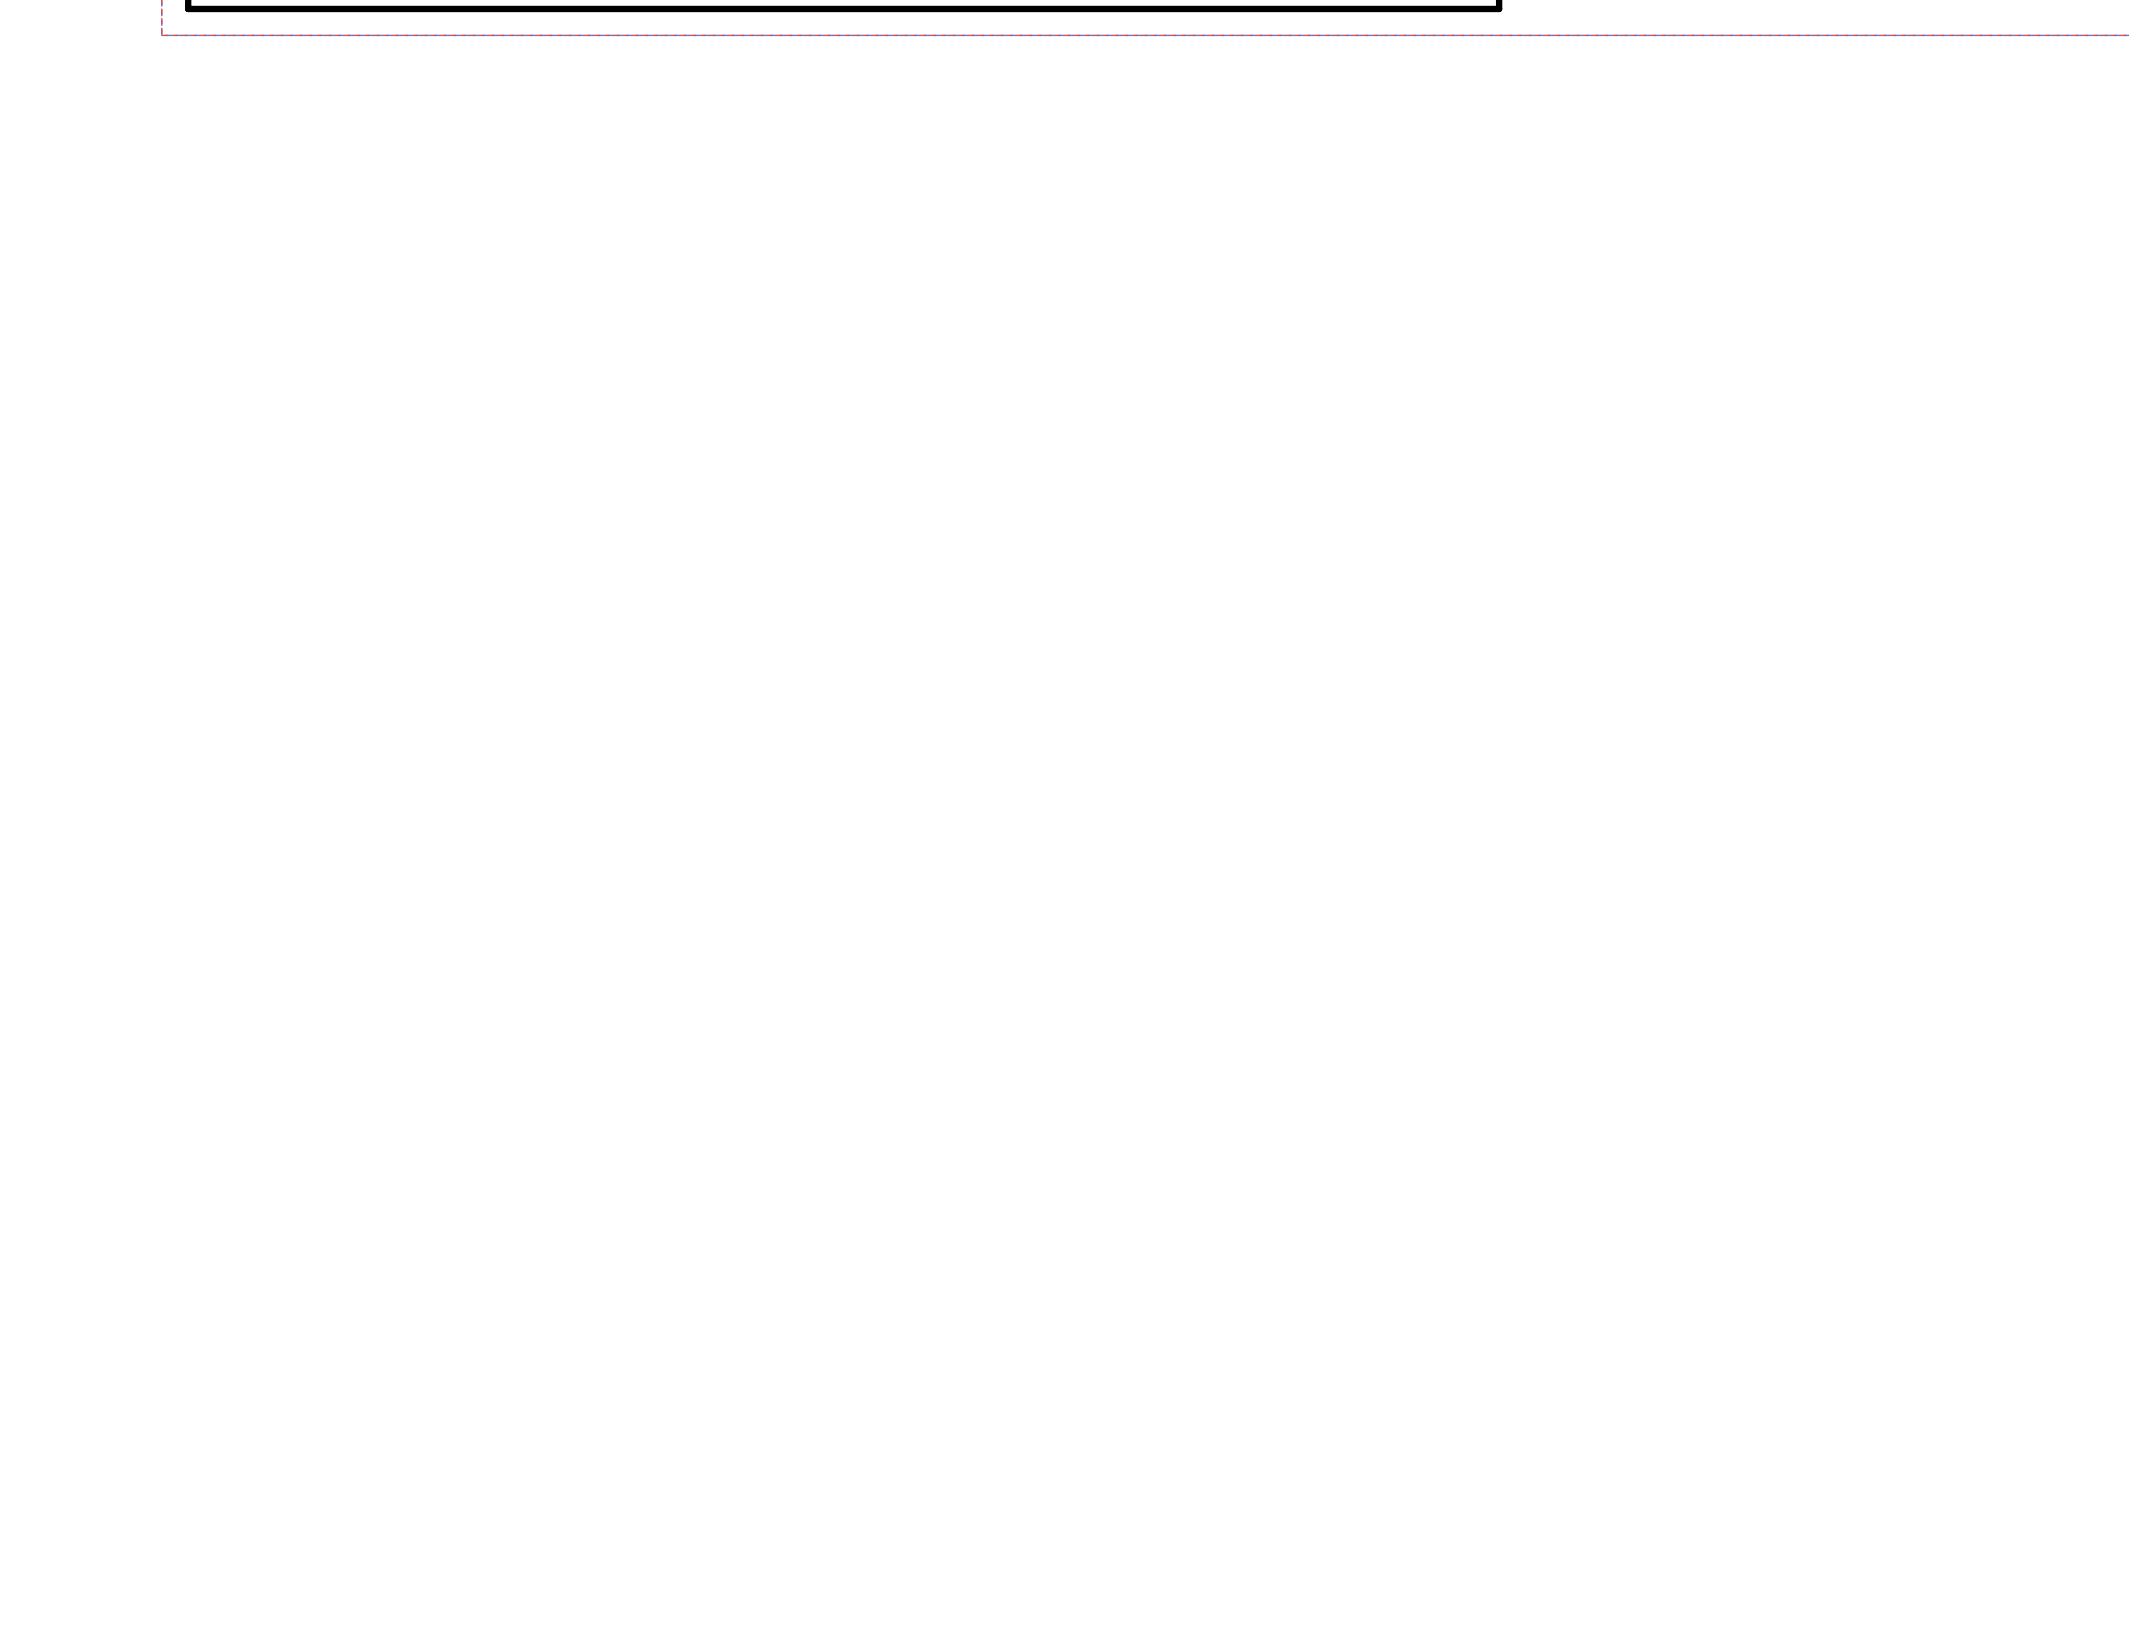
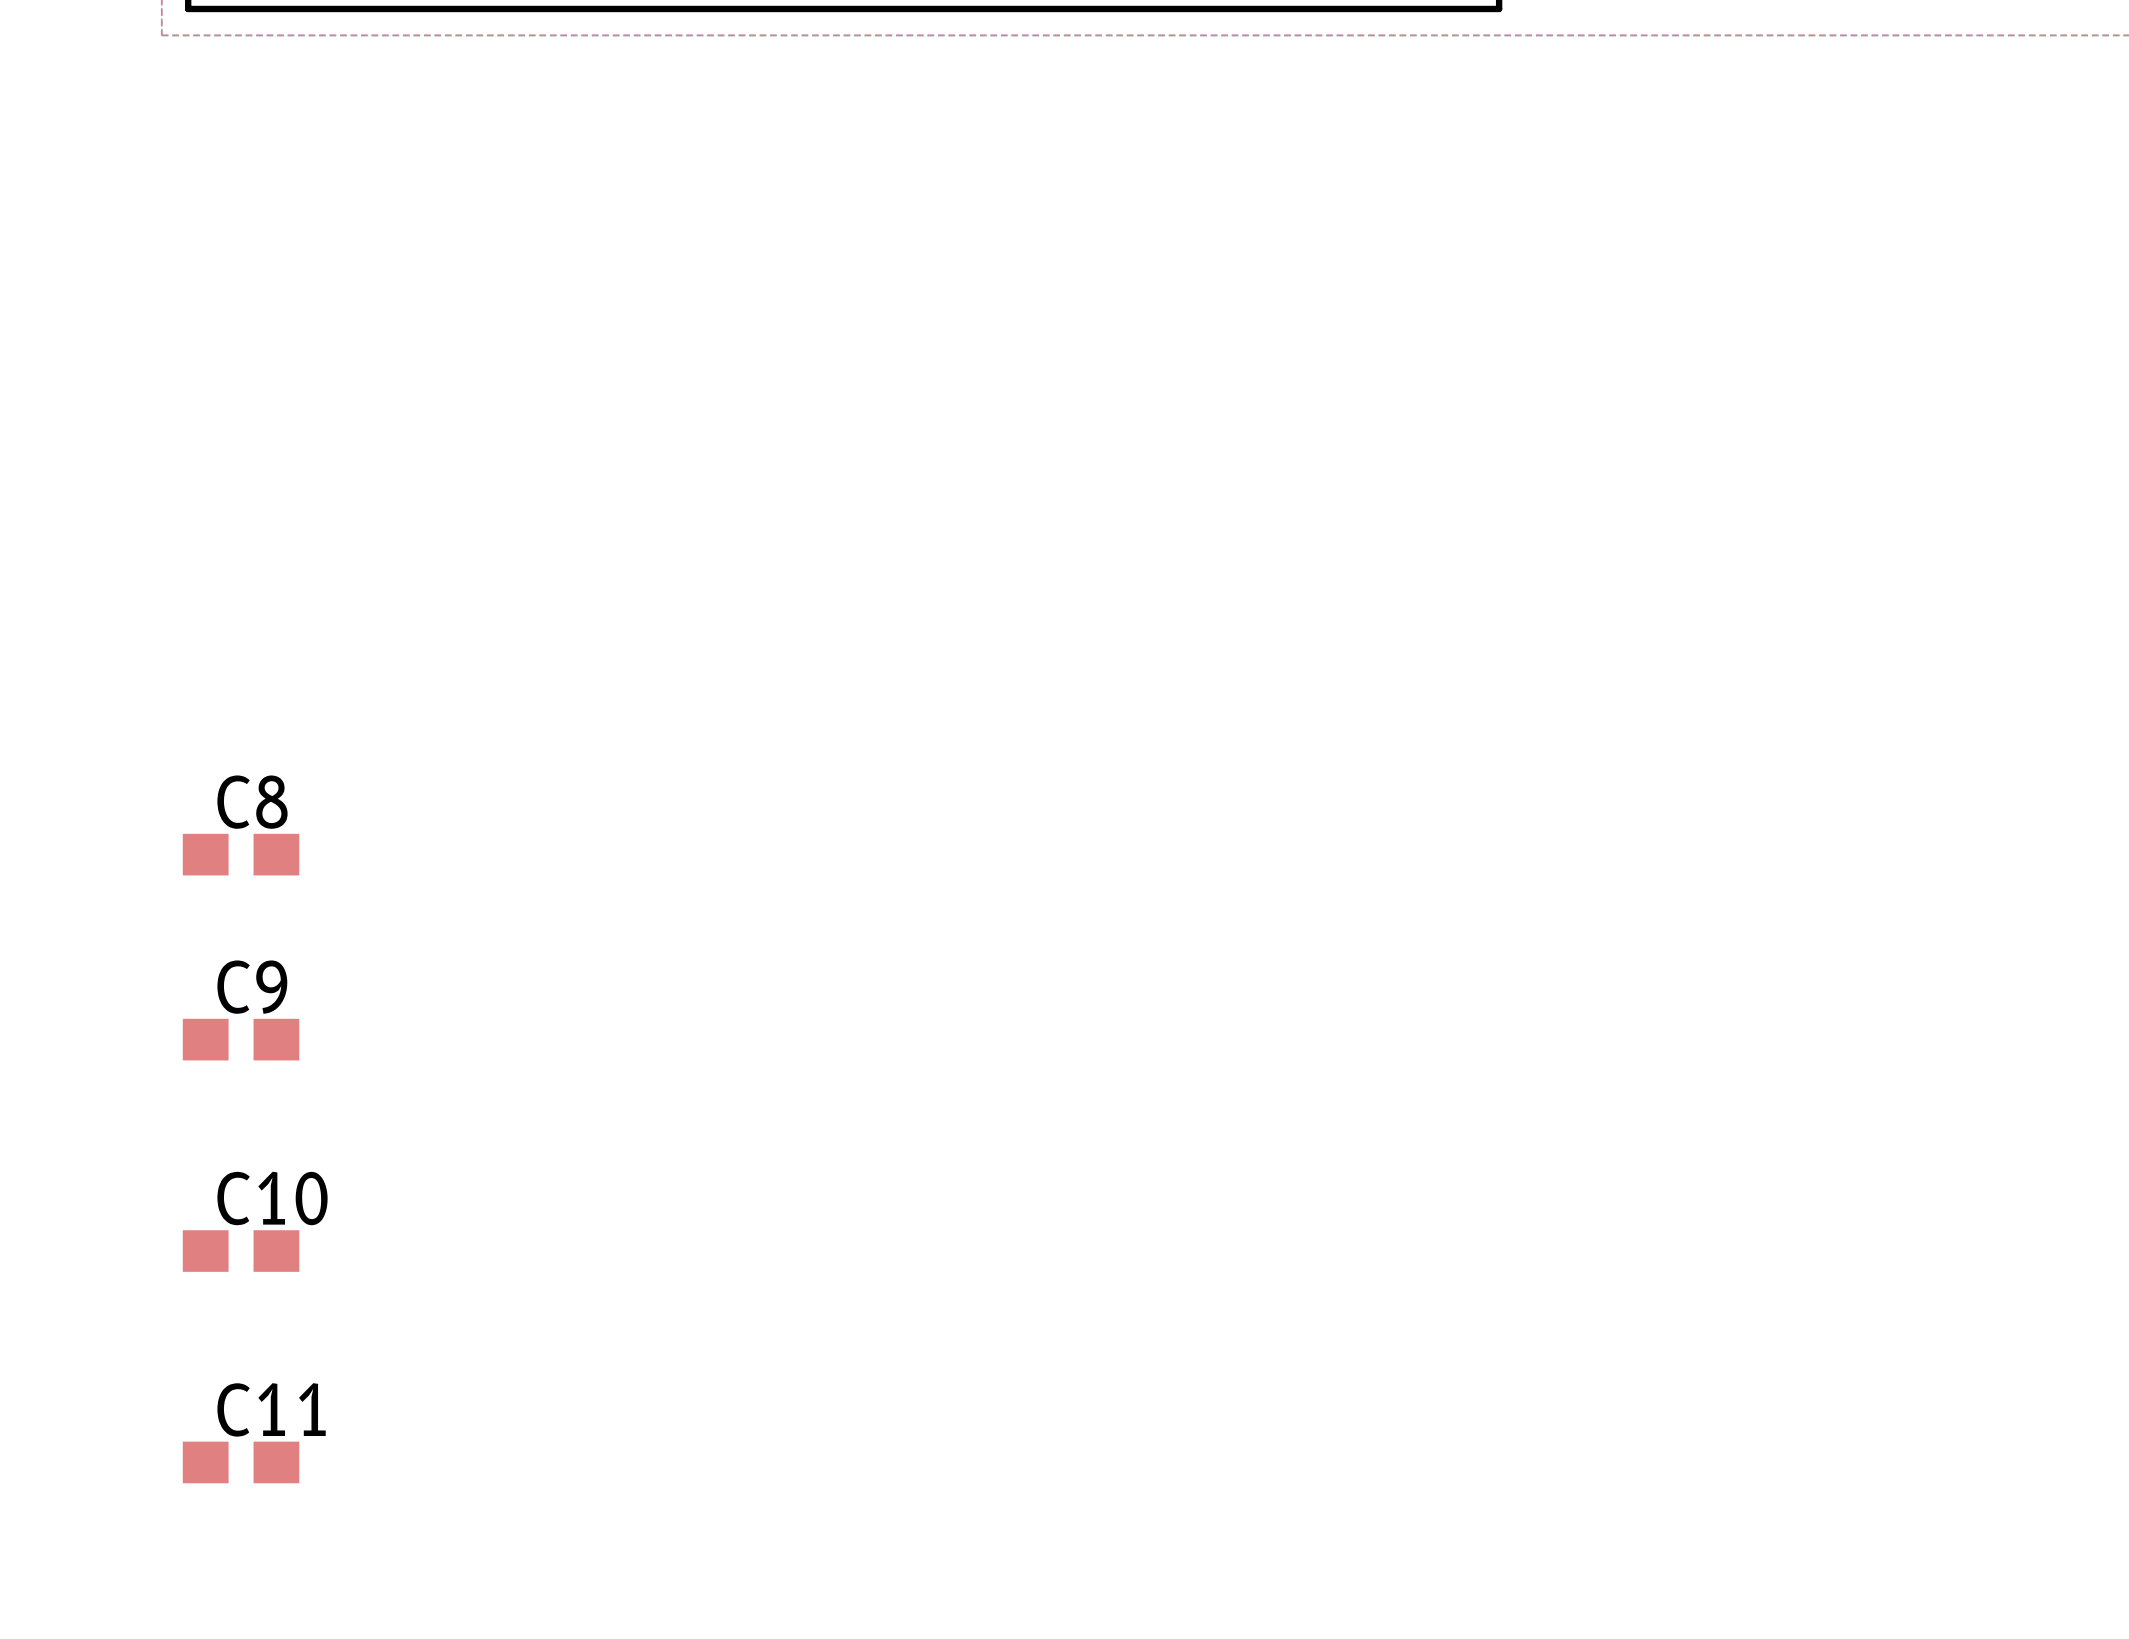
C8: none -> (241, 854)
C9: none -> (241, 1039)
C10: none -> (241, 1251)
C11: none -> (241, 1462)

